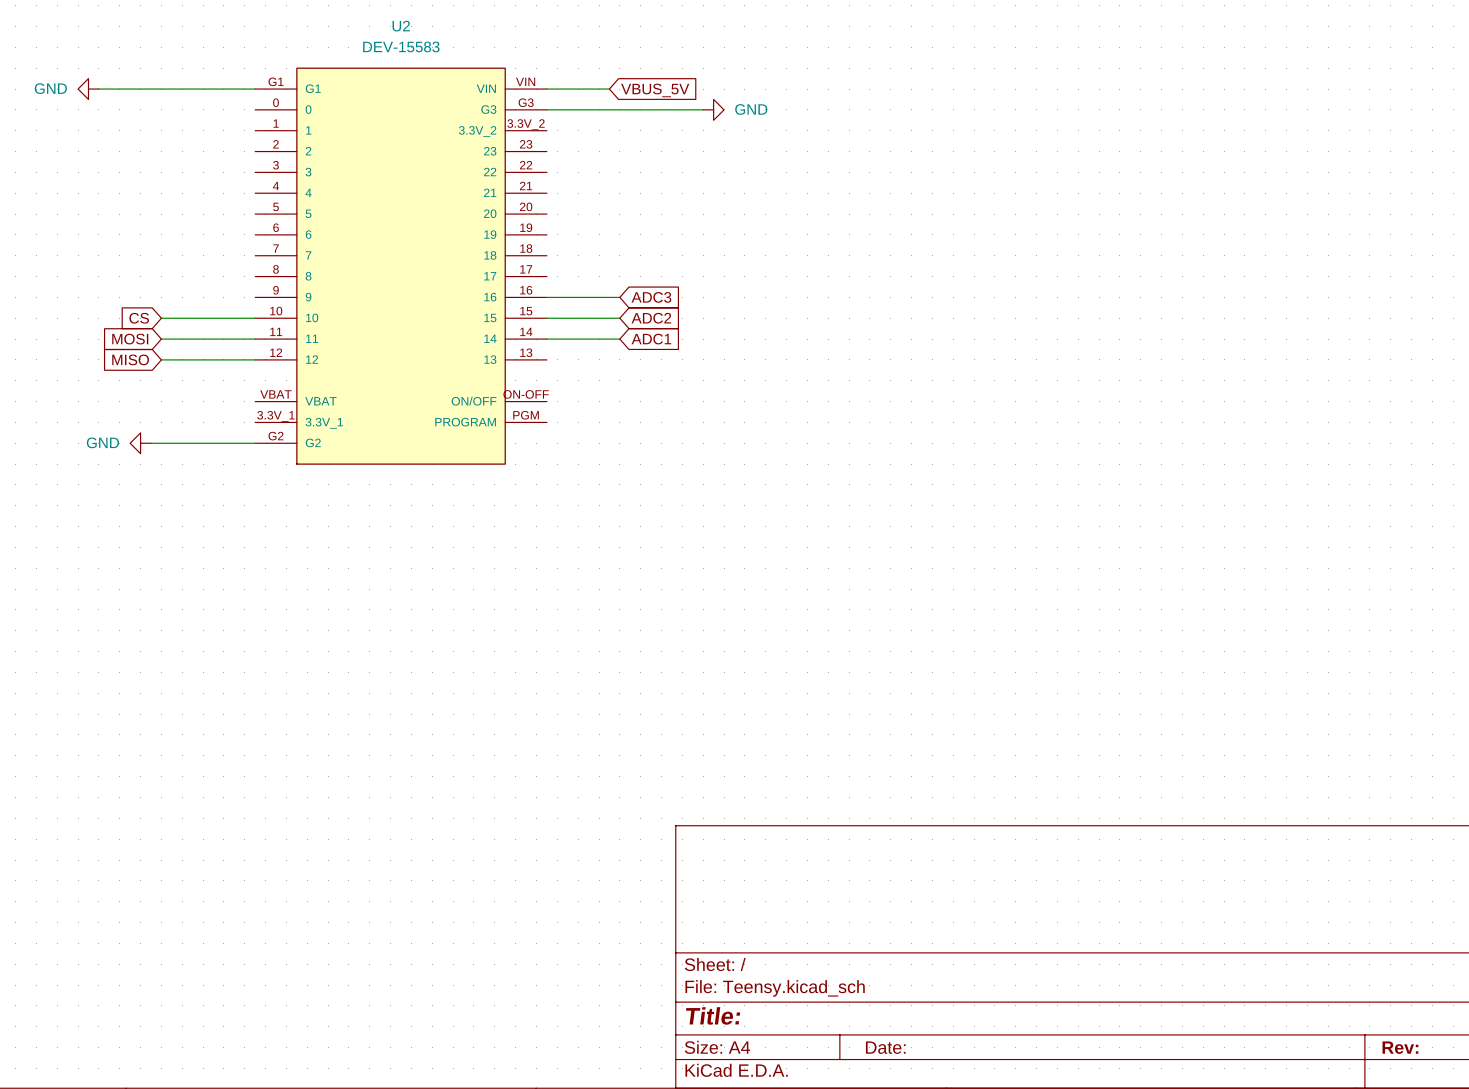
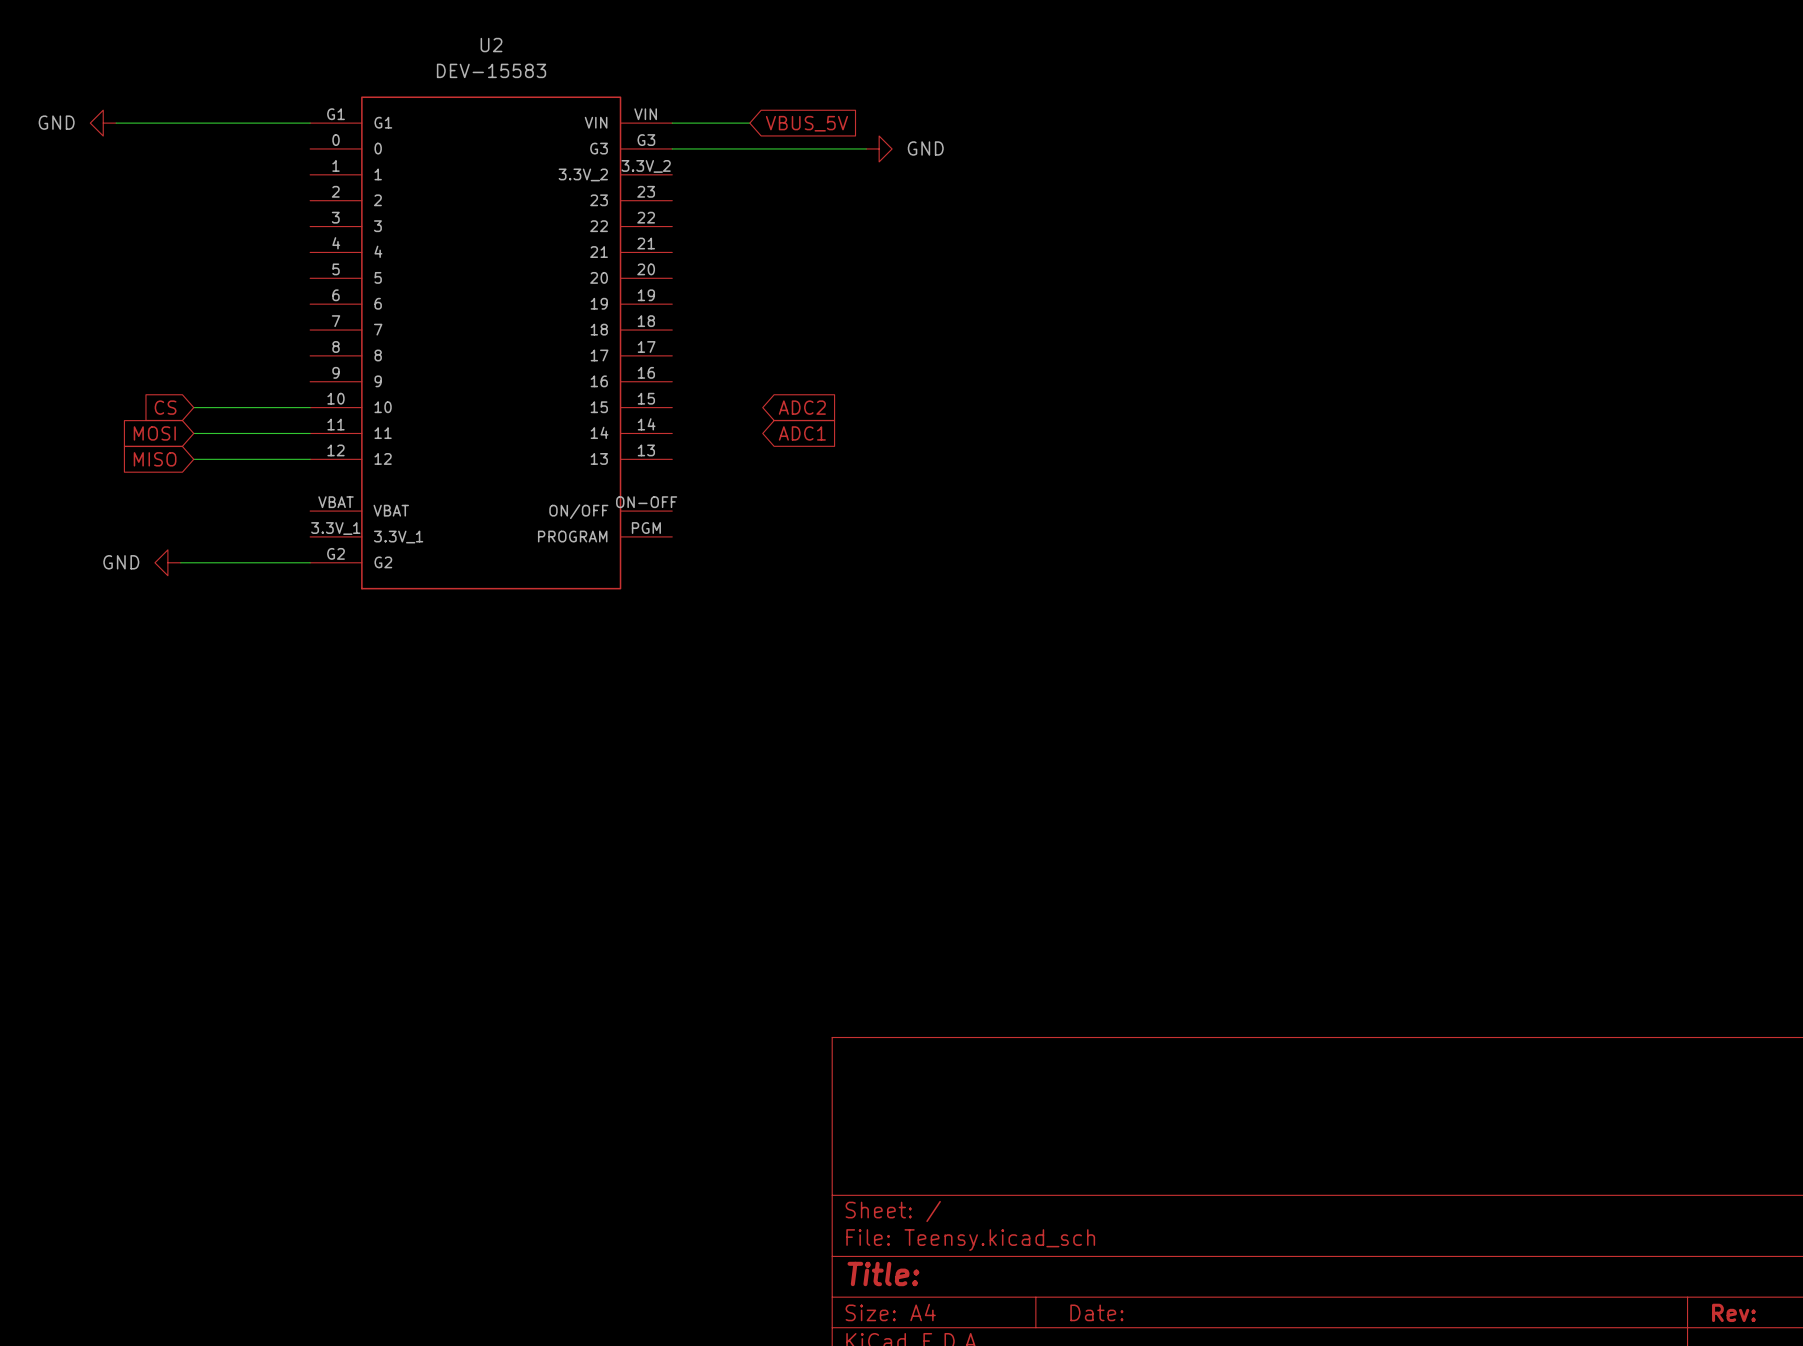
wire: (546, 297) (619, 297) -> none
global label: ADC3 (651, 297) -> none
wire: (546, 318) (619, 318) -> none
wire: (546, 339) (619, 339) -> none

